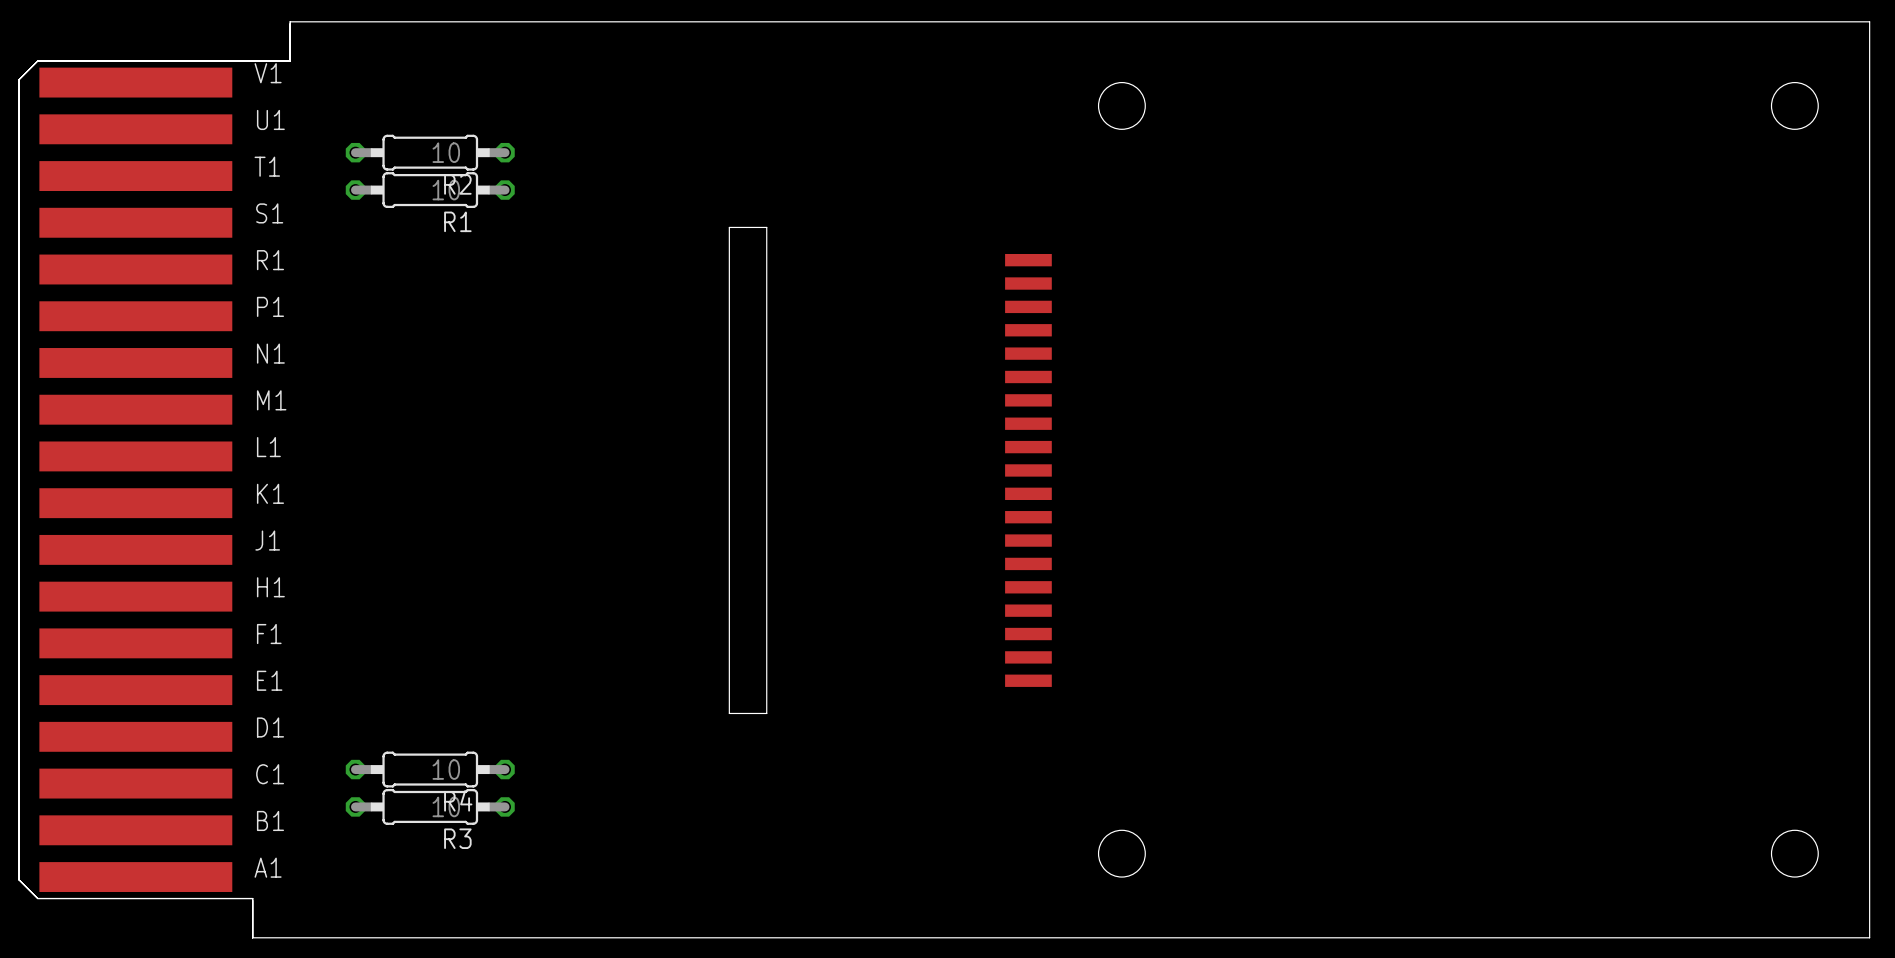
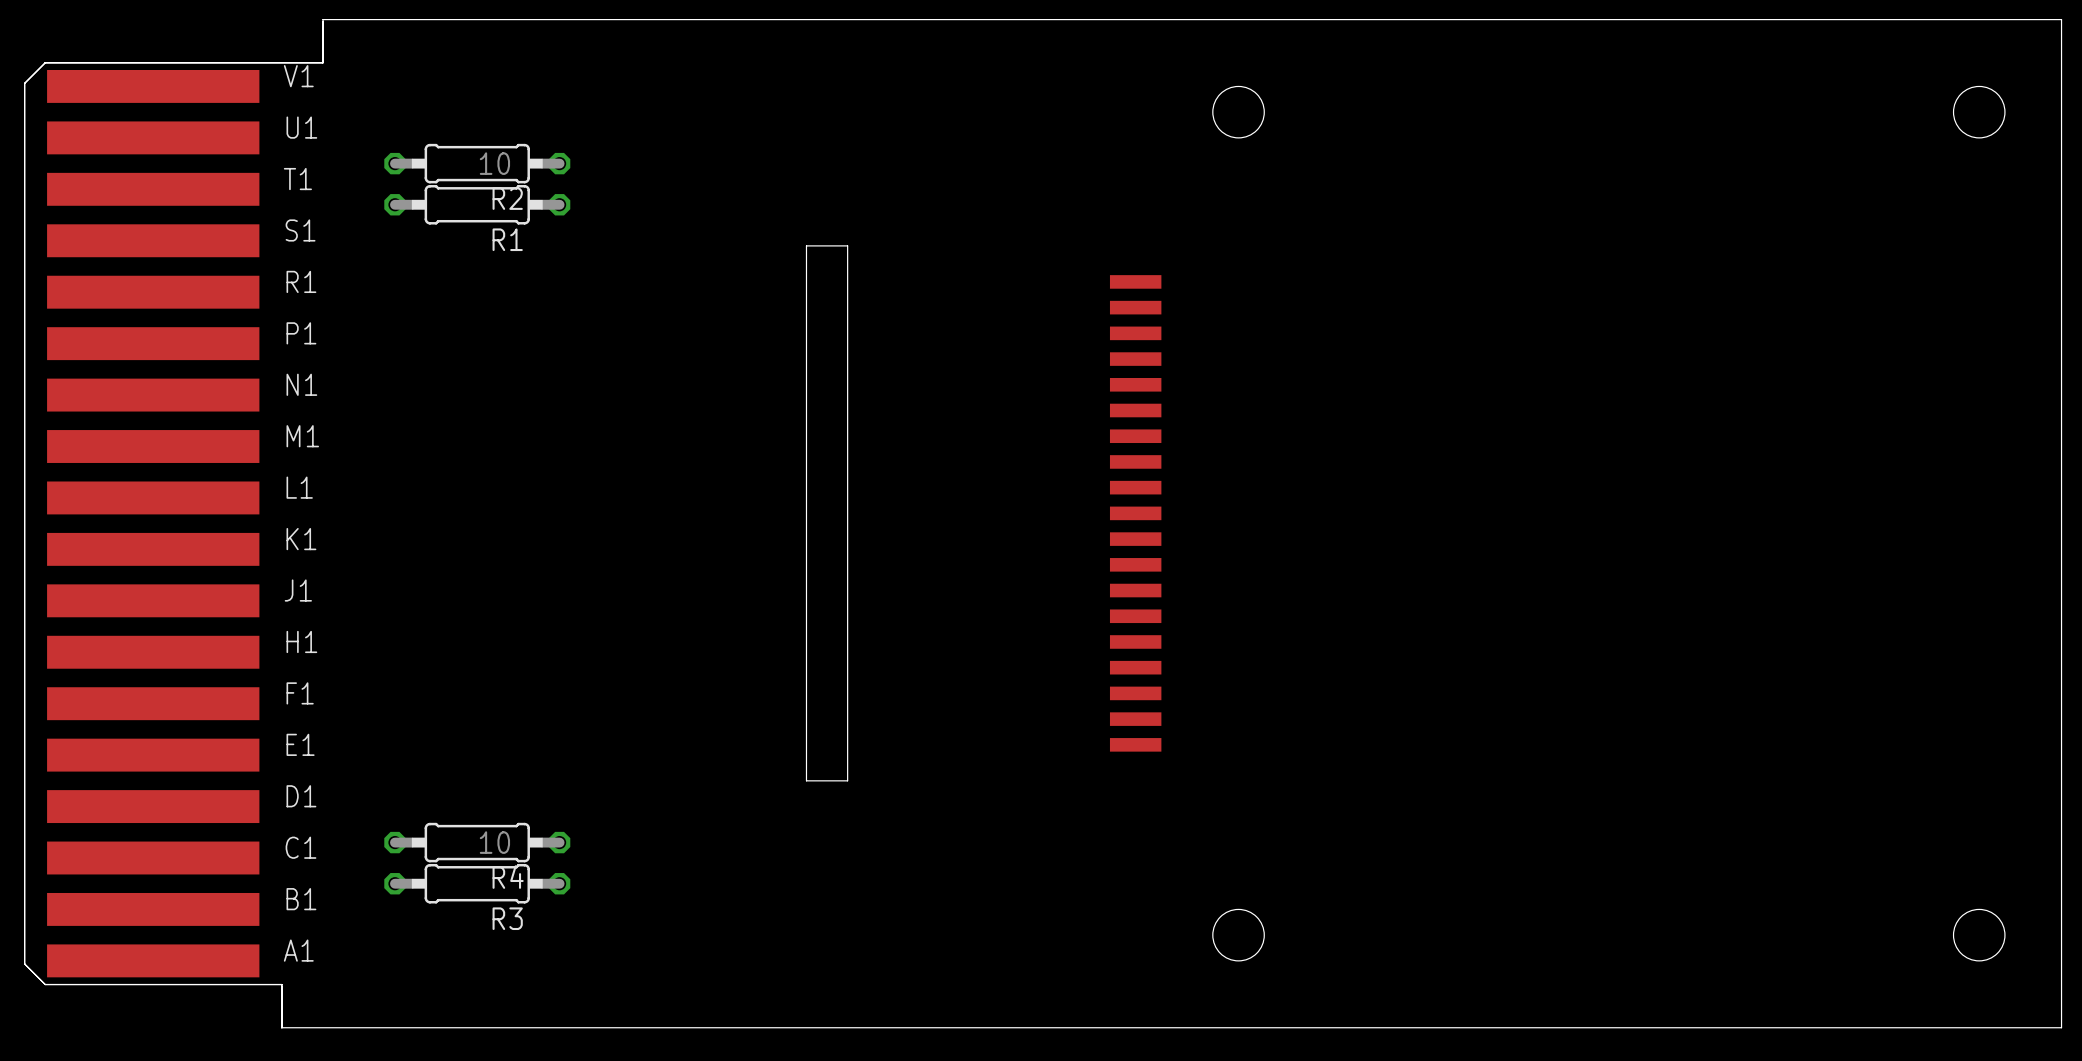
R1 value: 10 (446, 190) -> none
R3 value: 10 (446, 806) -> none

